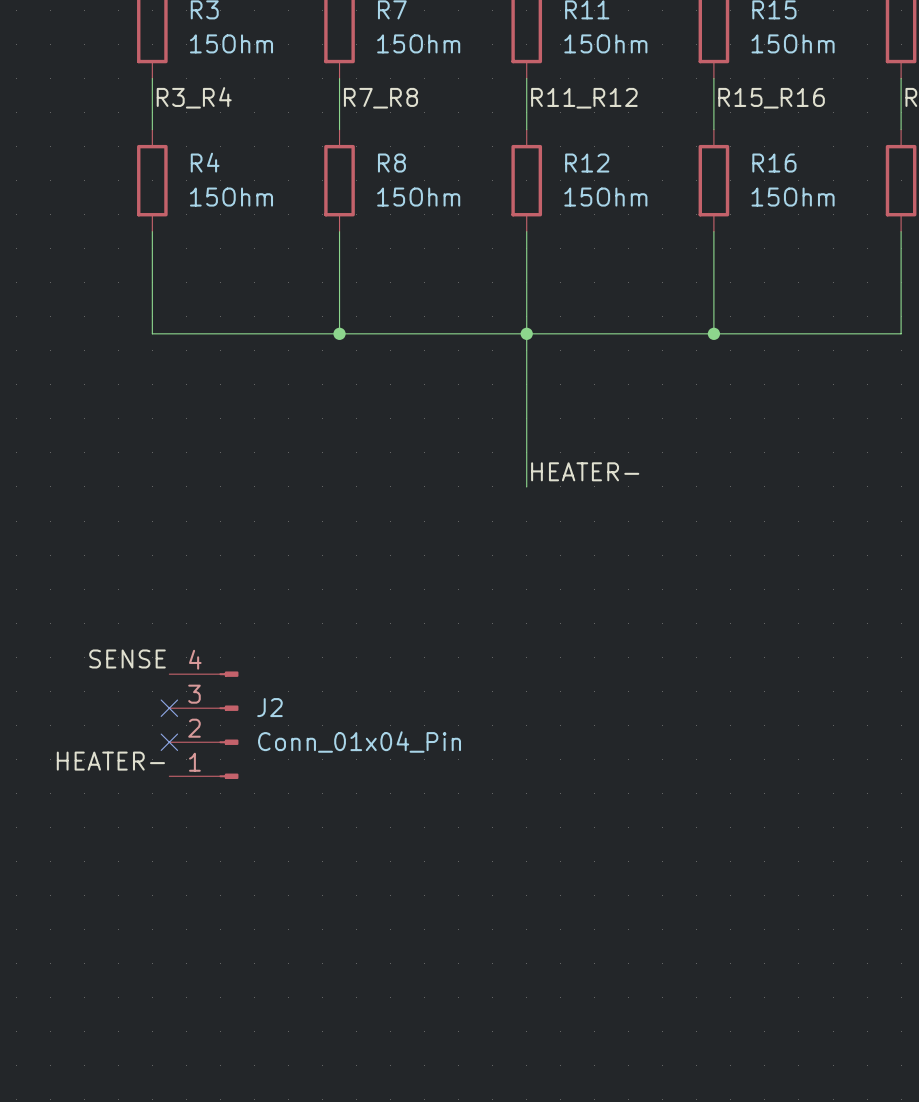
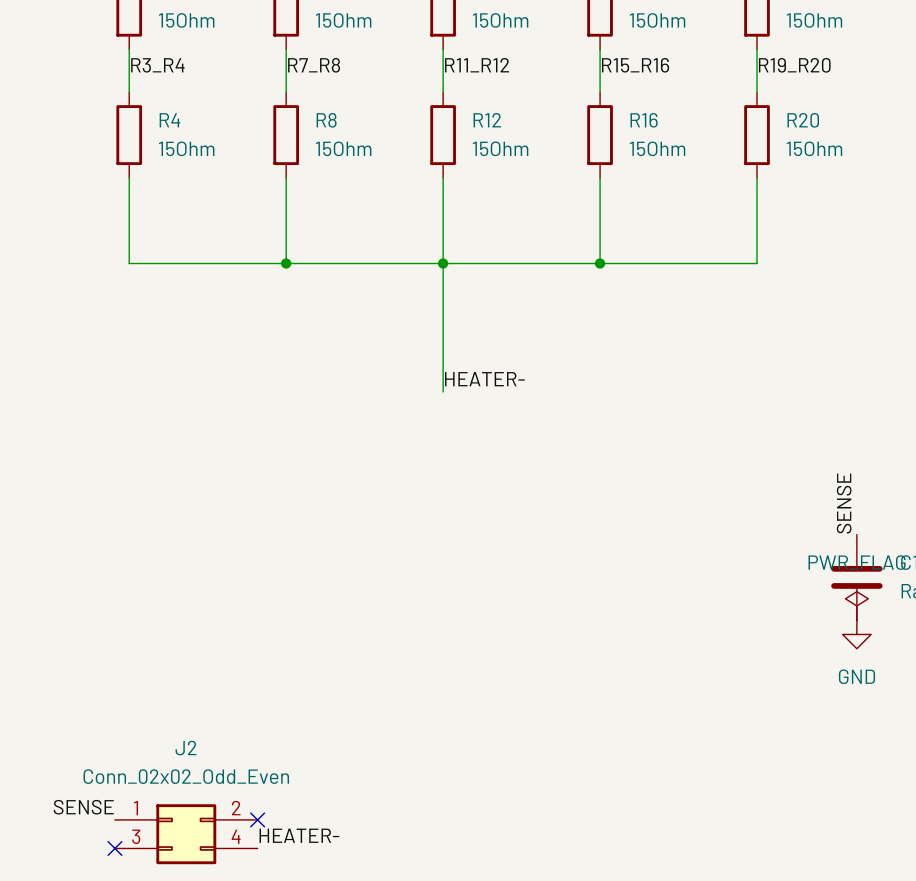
label position: SENSE (127, 658) -> SENSE (83, 807)
J2 symbol: [169, 671, 239, 780] -> [114, 804, 258, 865]
J2 name position: J2 (269, 707) -> J2 (186, 748)
no-connect mark: (169, 708) -> none
no-connect mark: (169, 742) -> none
J2 value: Conn_01x04_Pin (359, 742) -> Conn_02x02_Odd_Even (186, 776)
label position: HEATER- (110, 761) -> HEATER- (299, 835)
no-connect mark: none -> (257, 819)
no-connect mark: none -> (114, 848)

